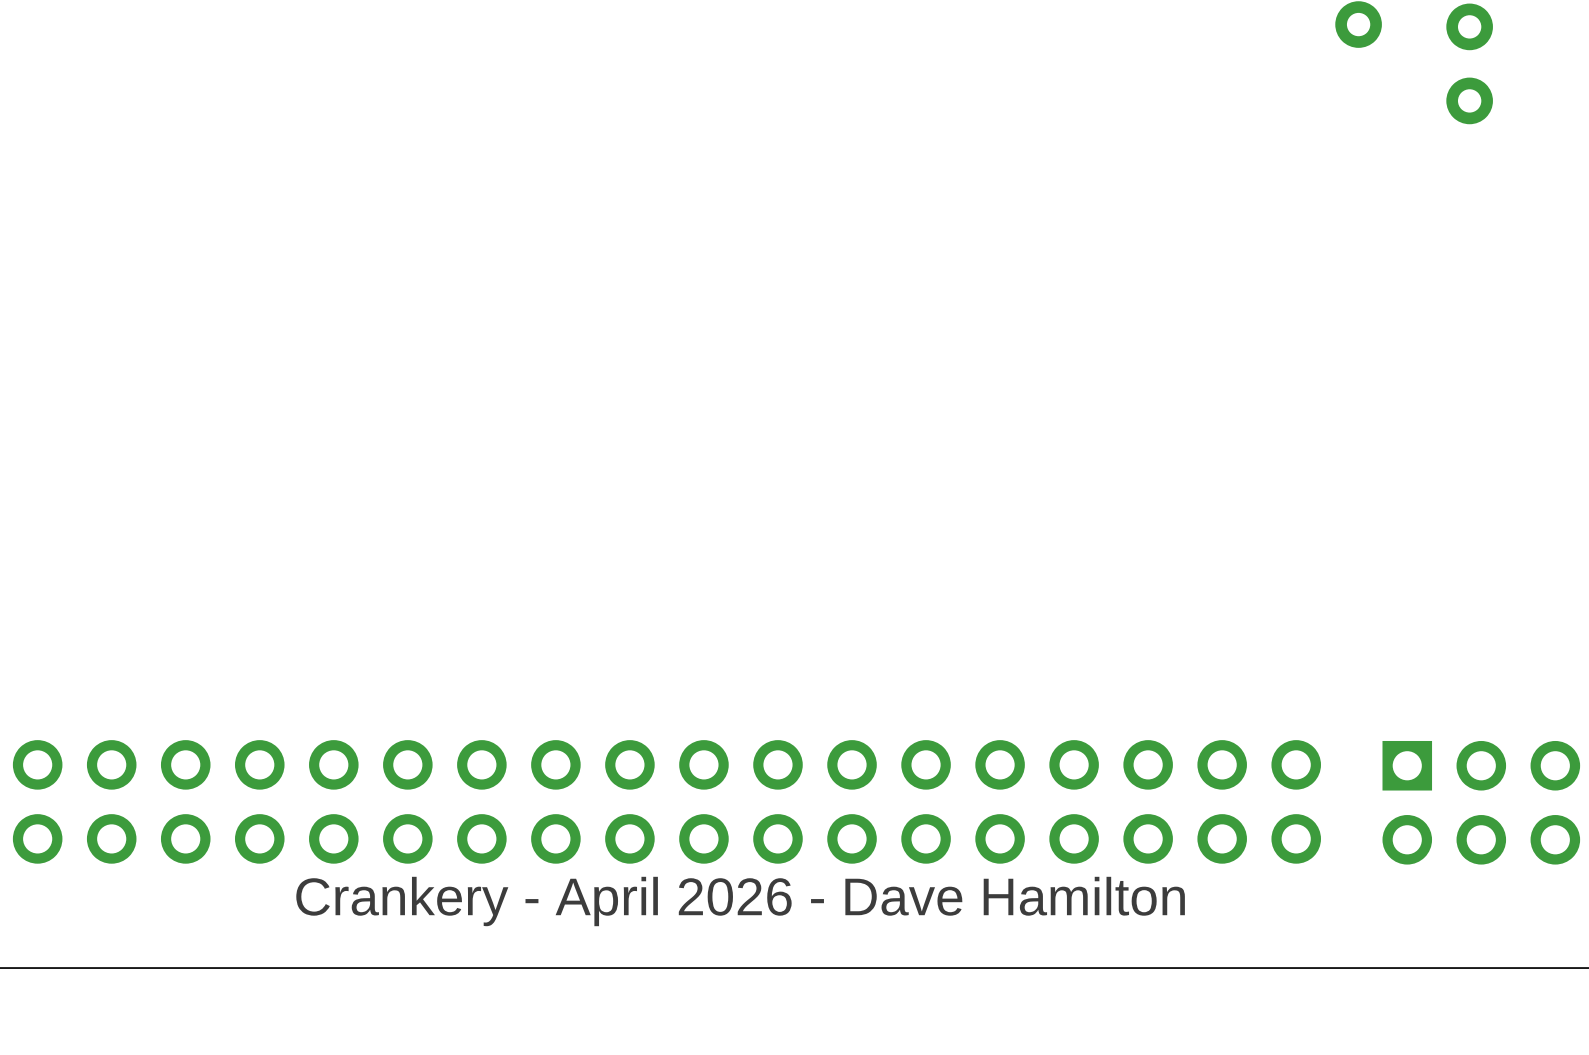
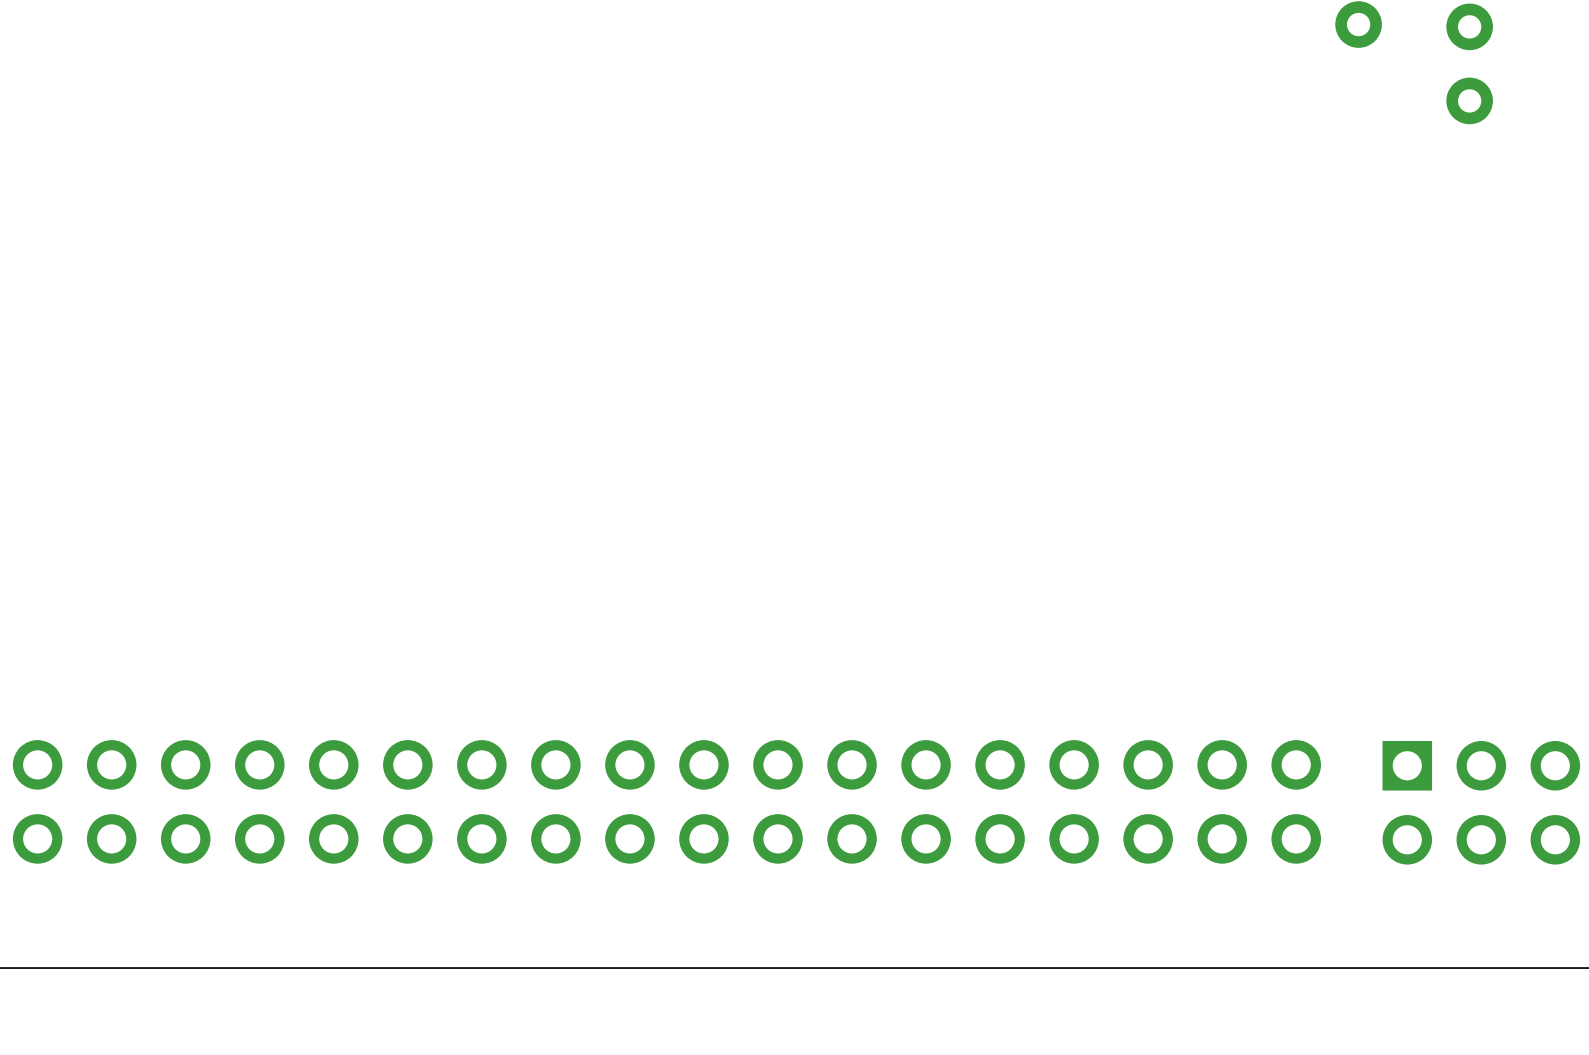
text: Crankery - April 2026 - Dave Hamilton (740, 901) -> none

